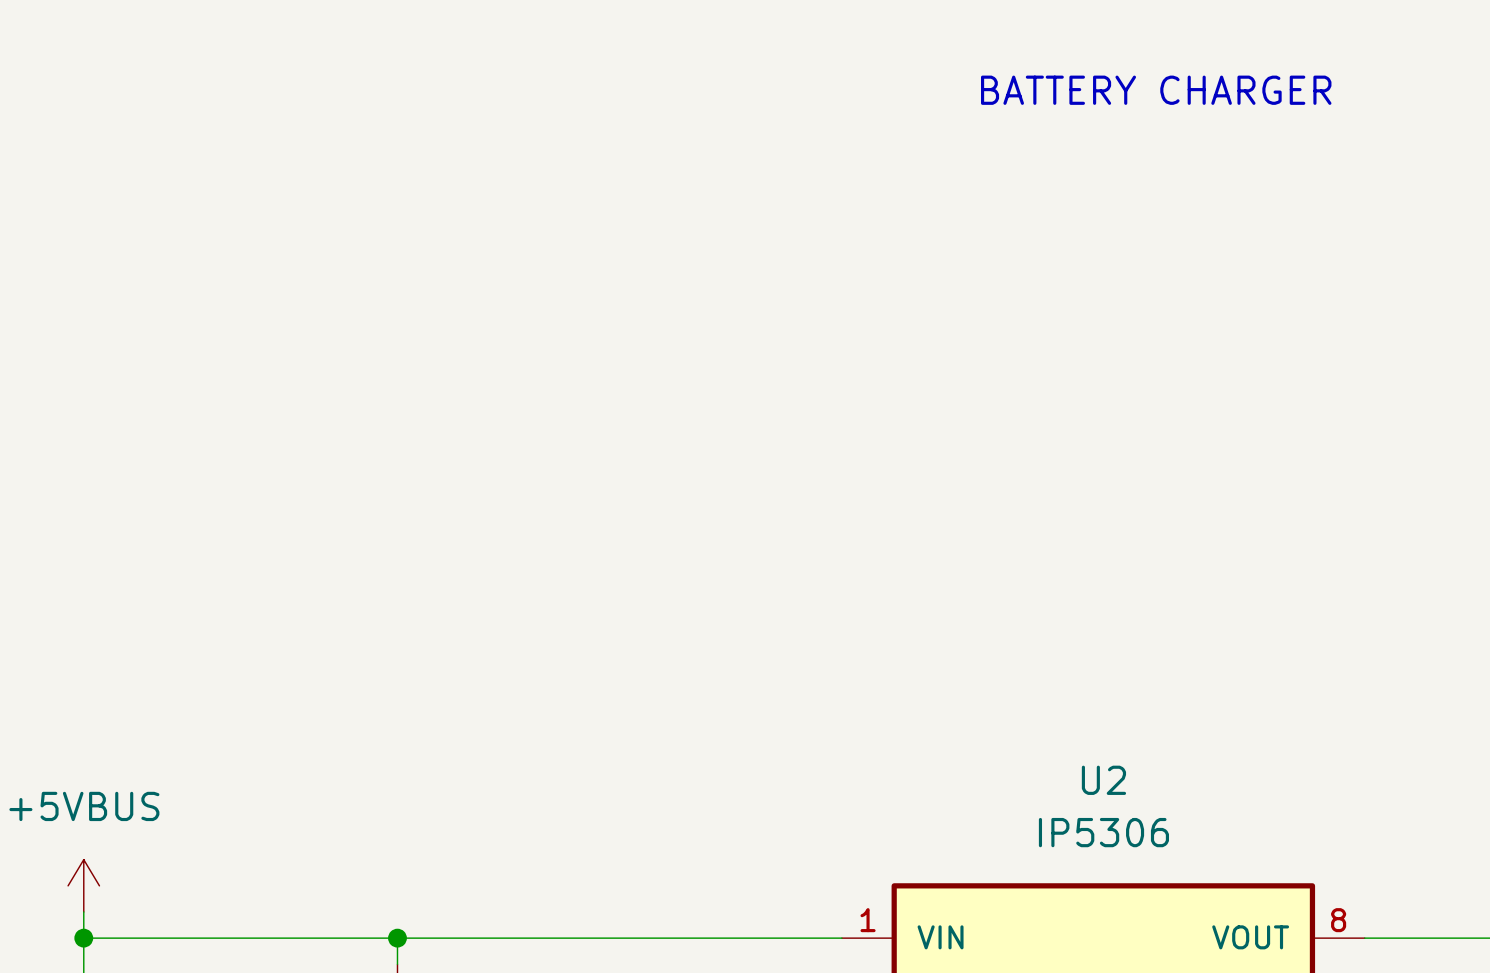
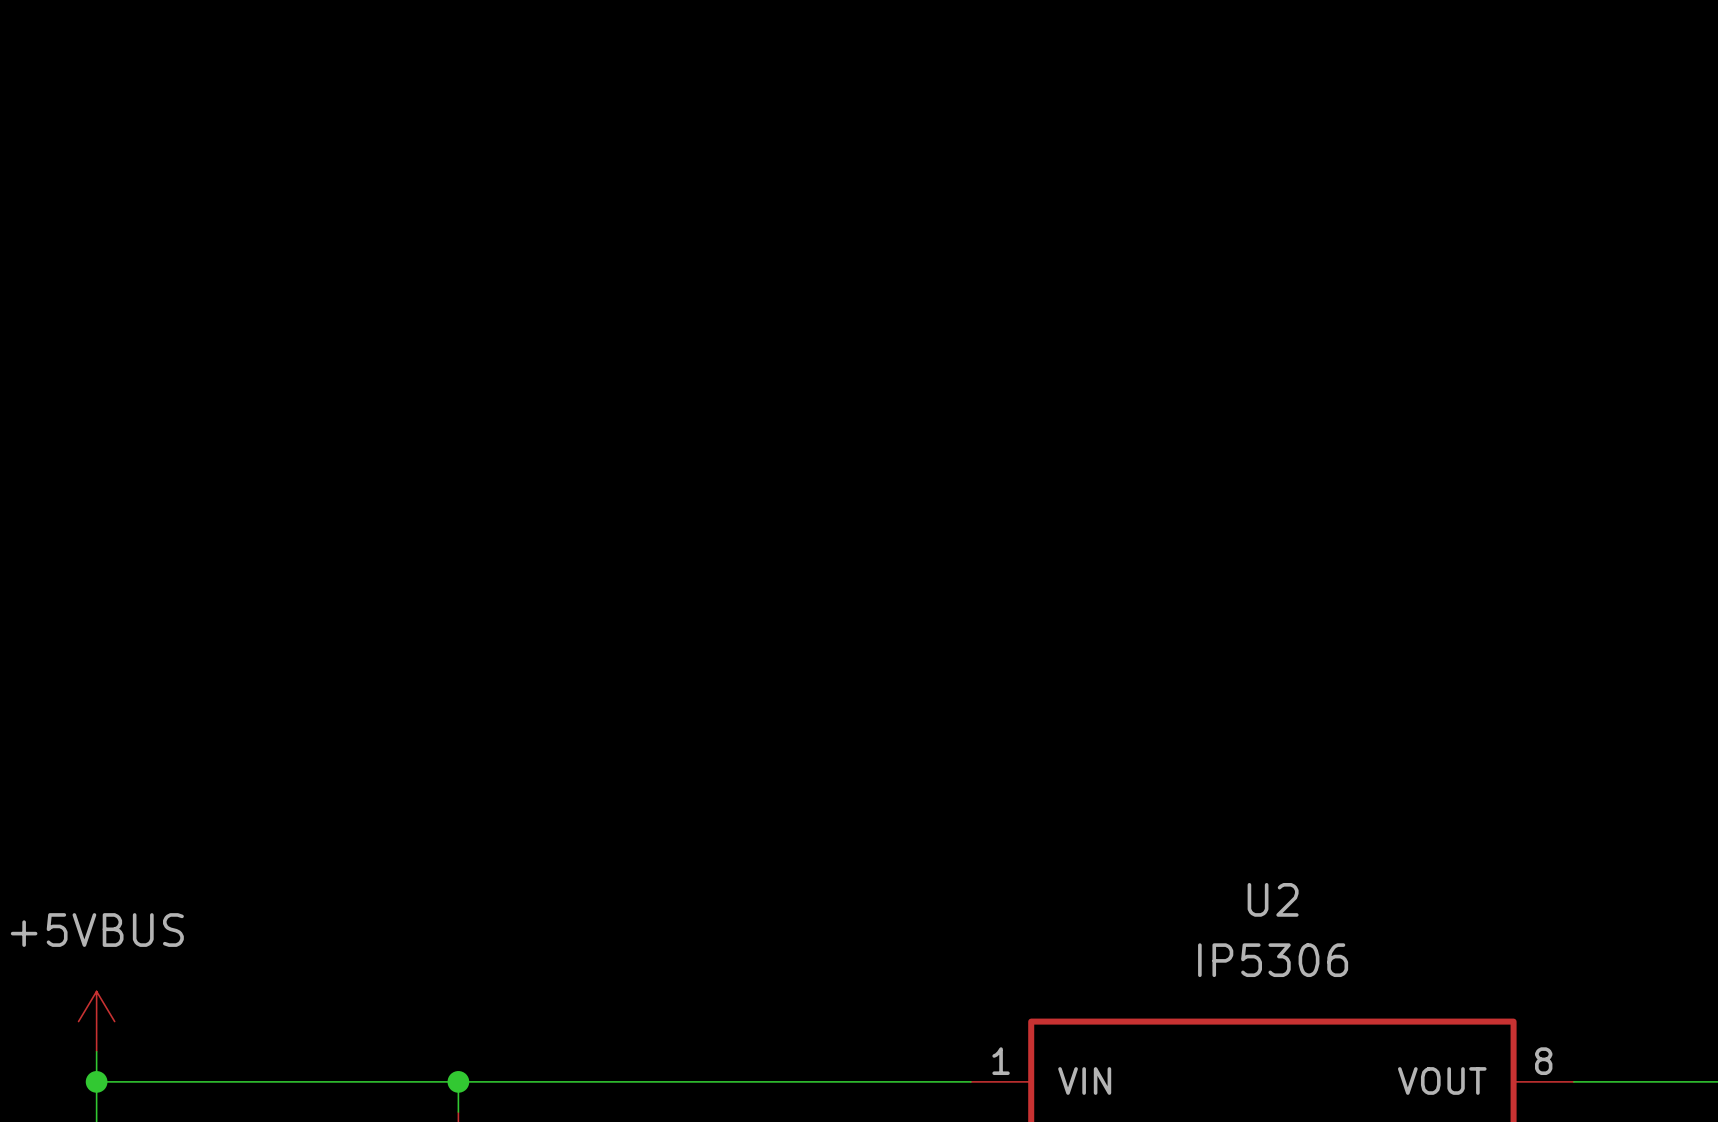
text: BATTERY CHARGER (1156, 90) -> none

